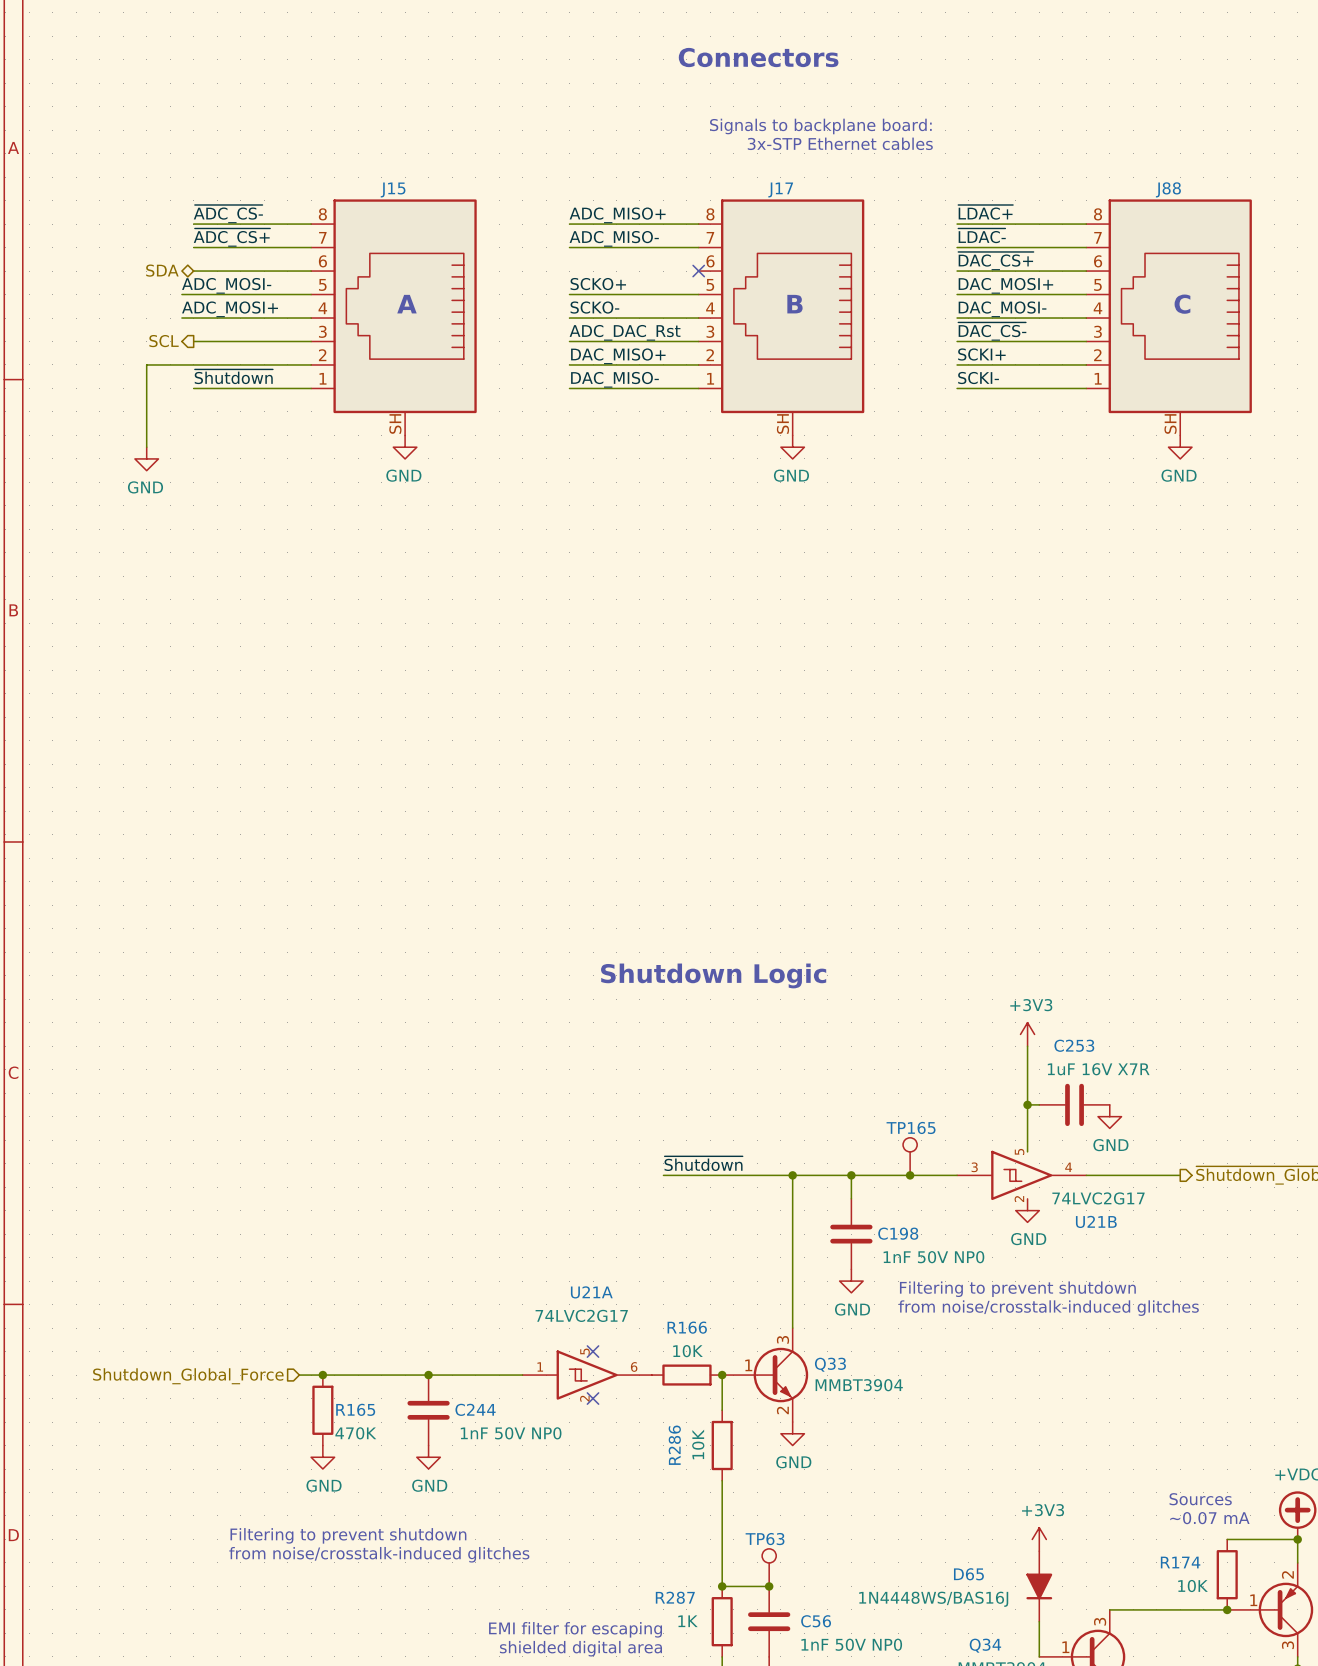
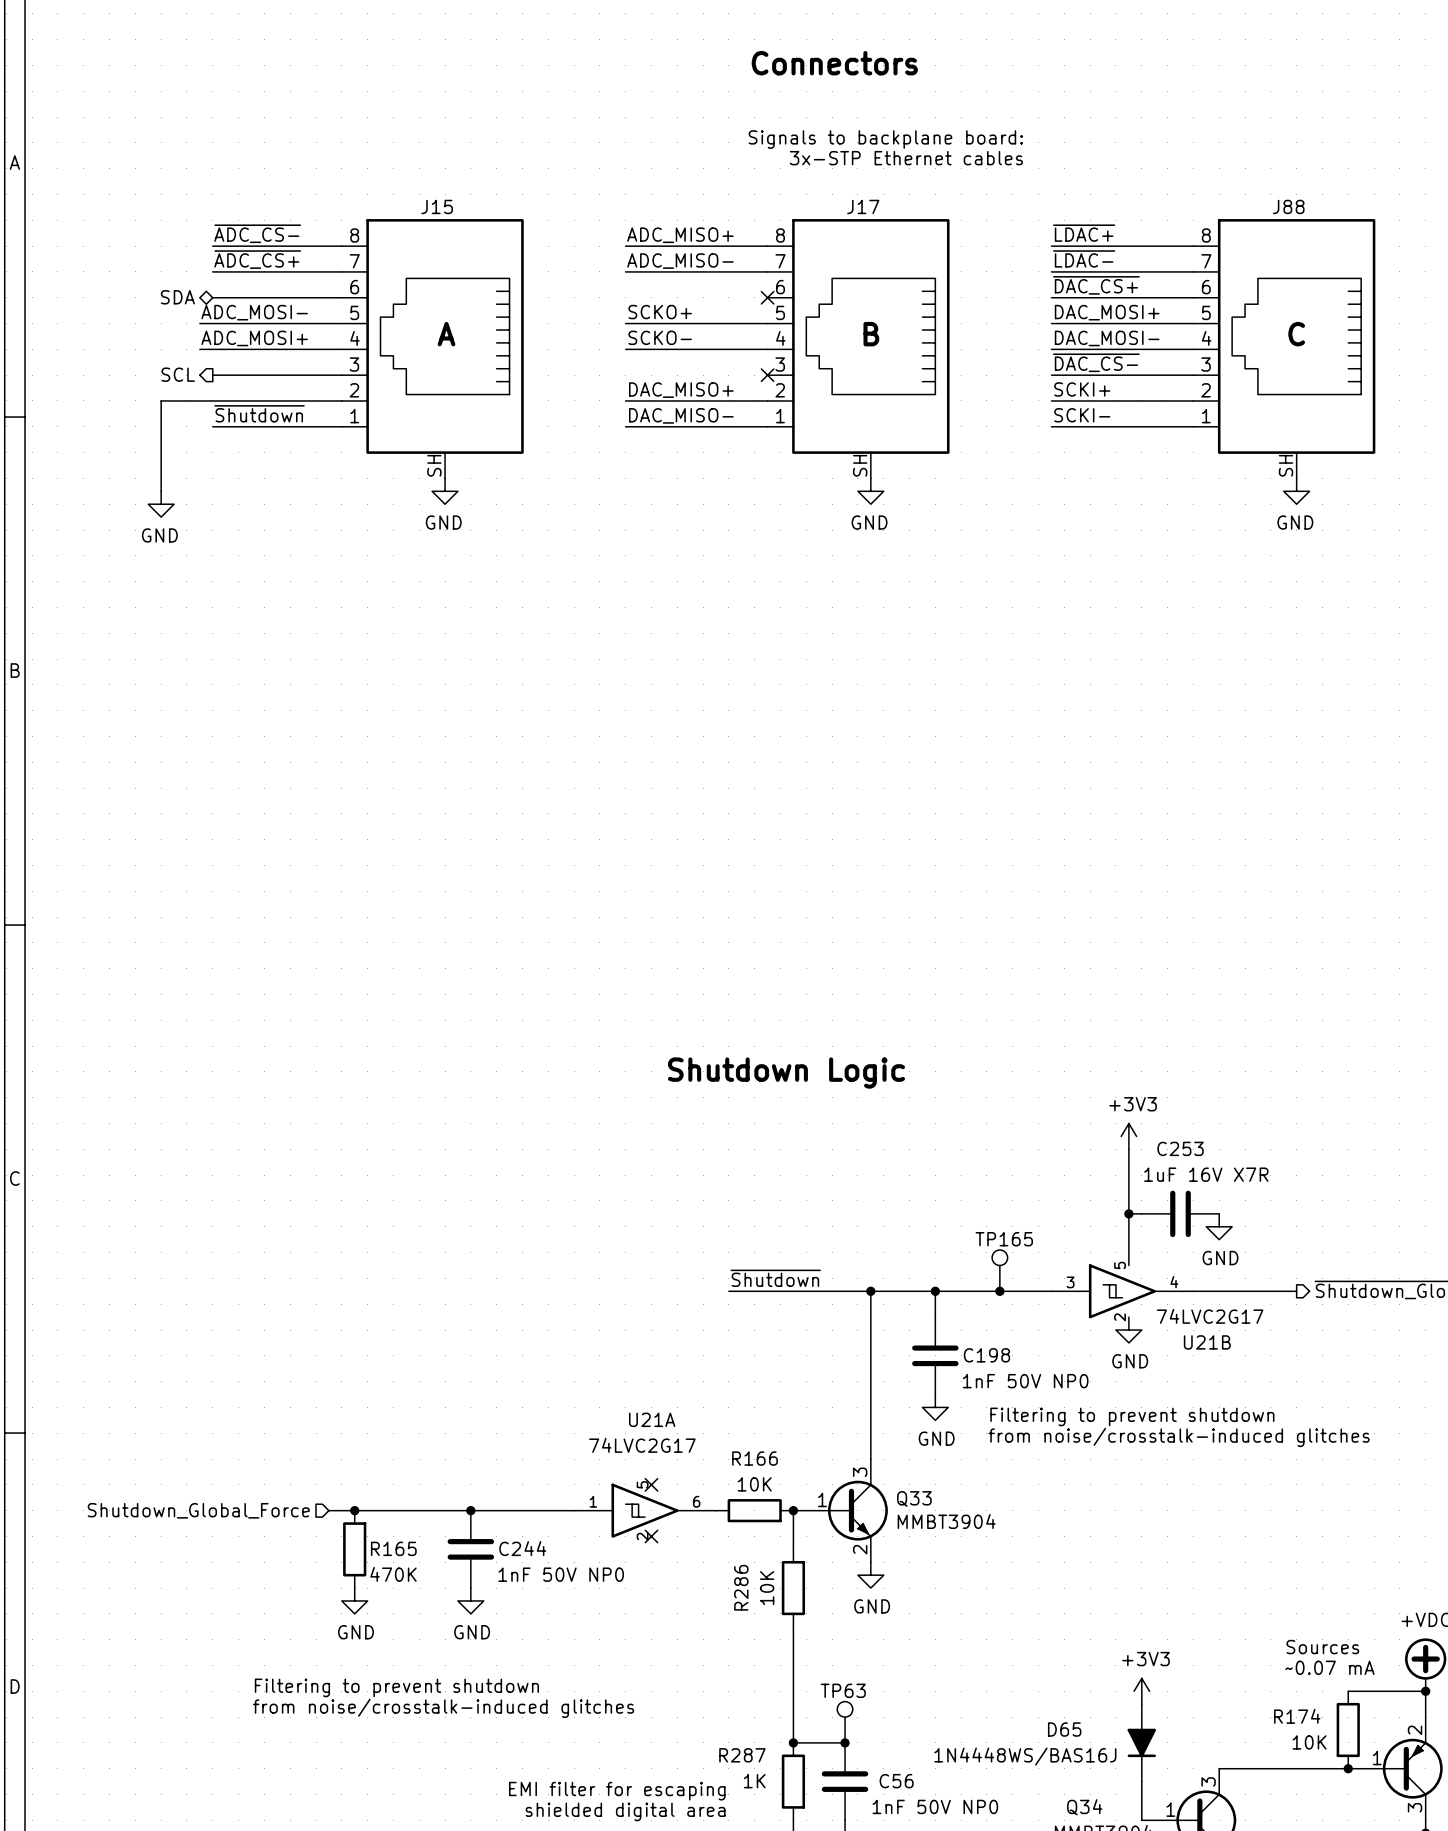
label: ADC_DAC_Rst (625, 332) -> none
wire: (569, 341) (698, 341) -> none
no-connect mark: none -> (767, 375)

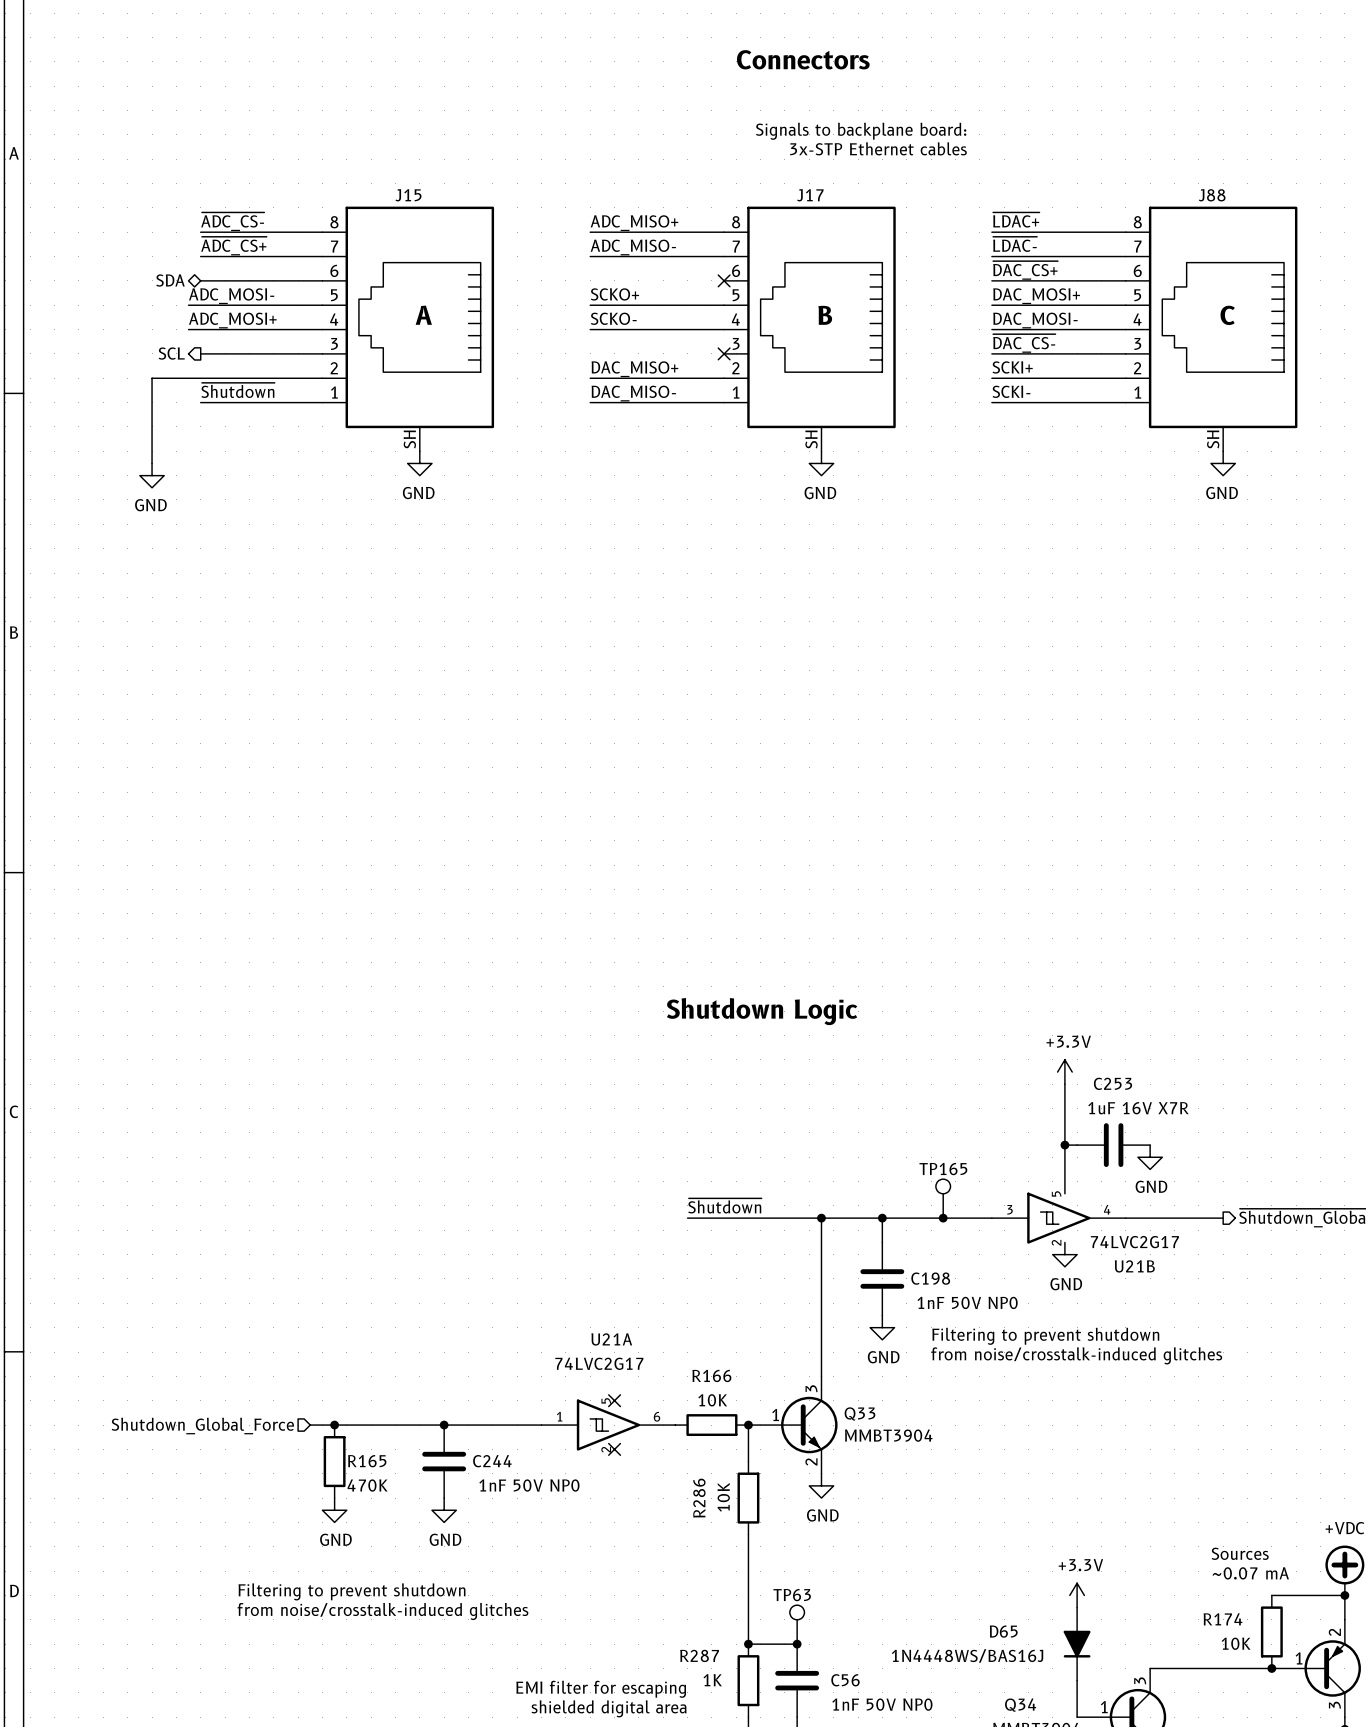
power symbol: +3V3 (1128, 1136) -> +3.3V (1064, 1072)
power symbol: +3V3 (1141, 1691) -> +3.3V (1077, 1595)

